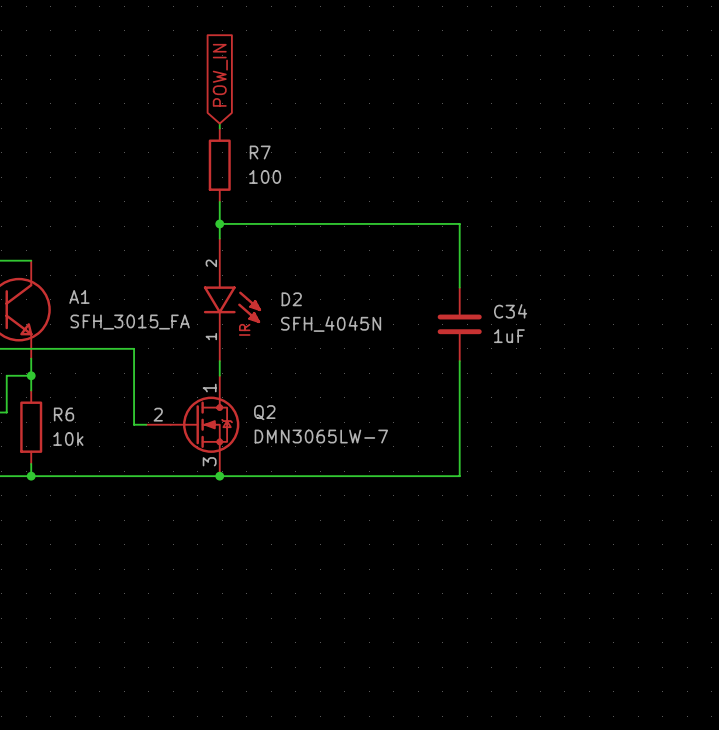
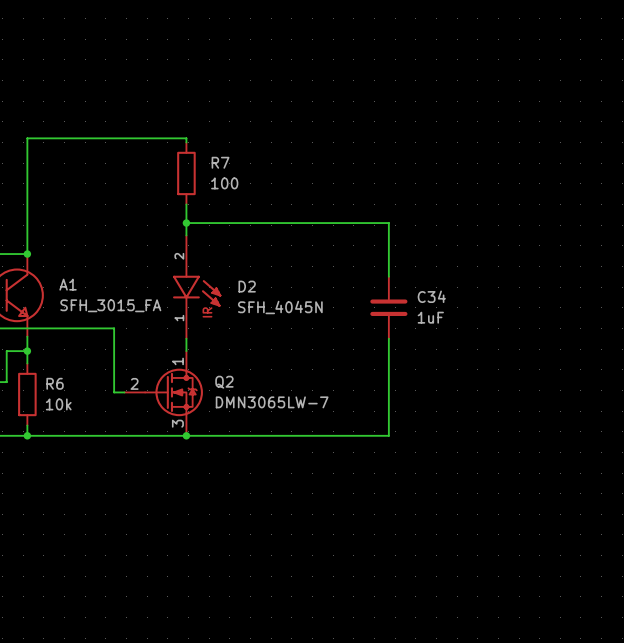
global label: POW_IN (220, 75) -> none
wire: none -> (186, 138) (27, 138) (27, 254)
junction: none -> (27, 254)

